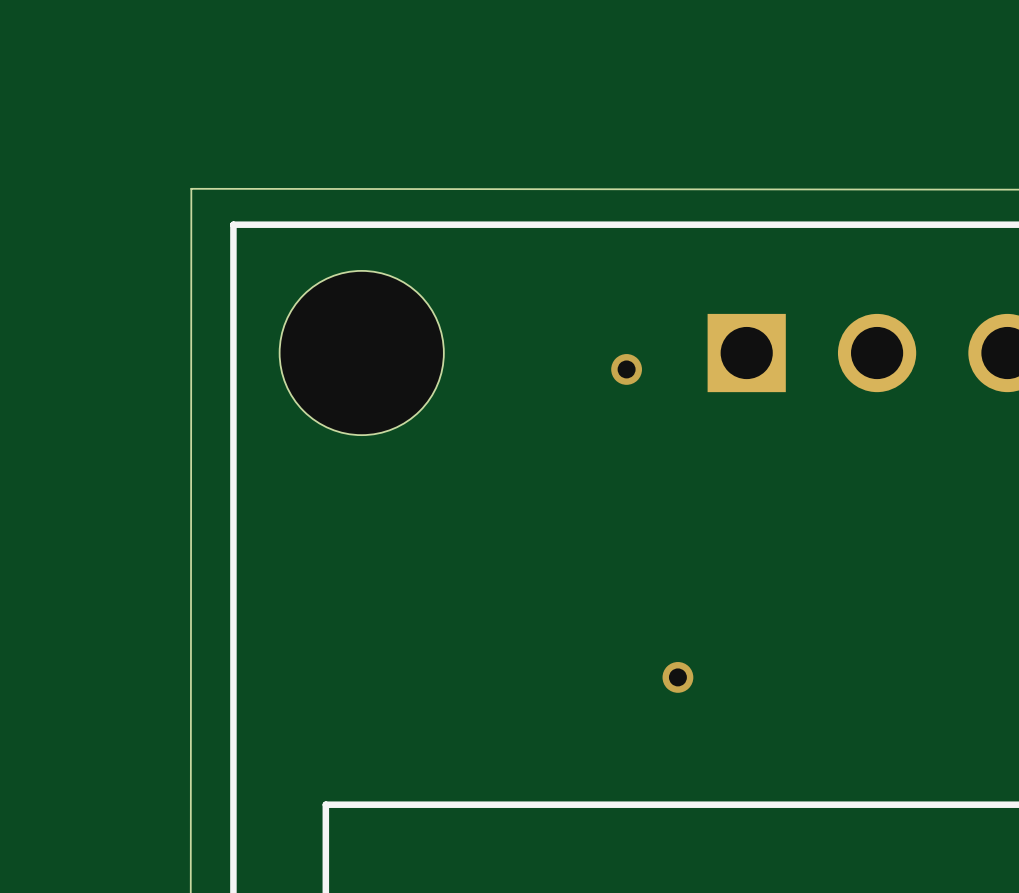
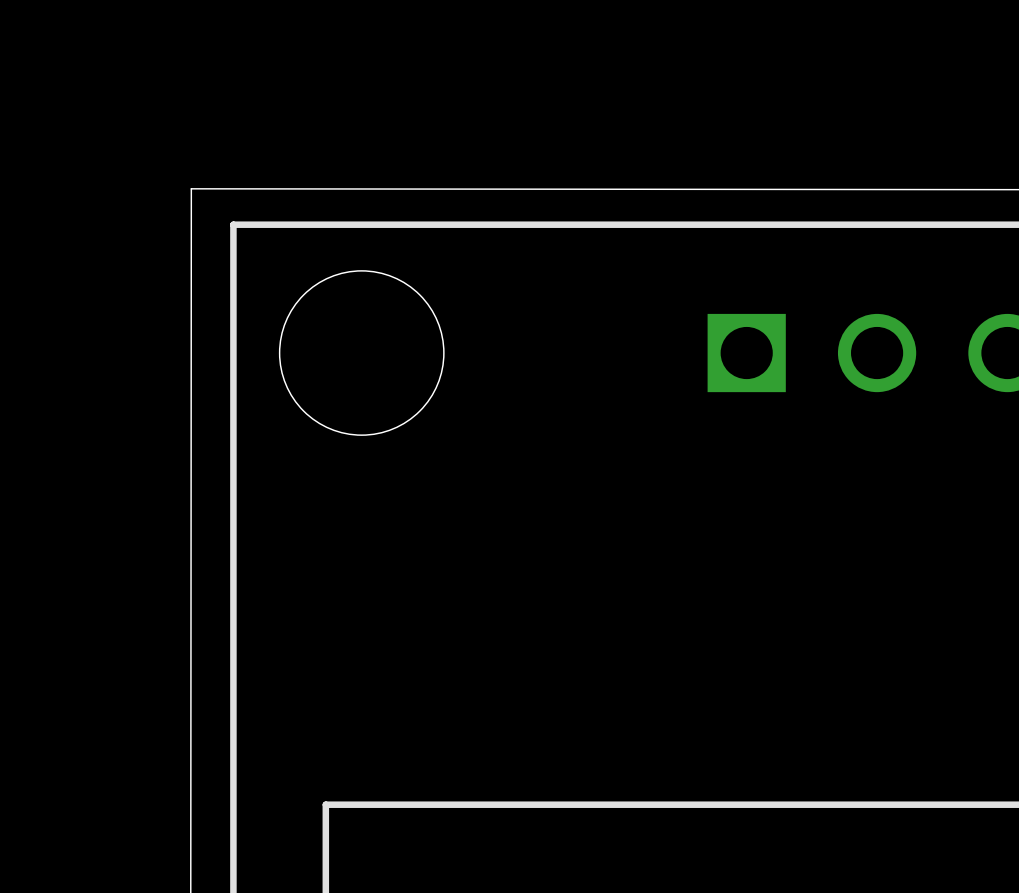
via: (626, 369) -> none
via: (677, 677) -> none

